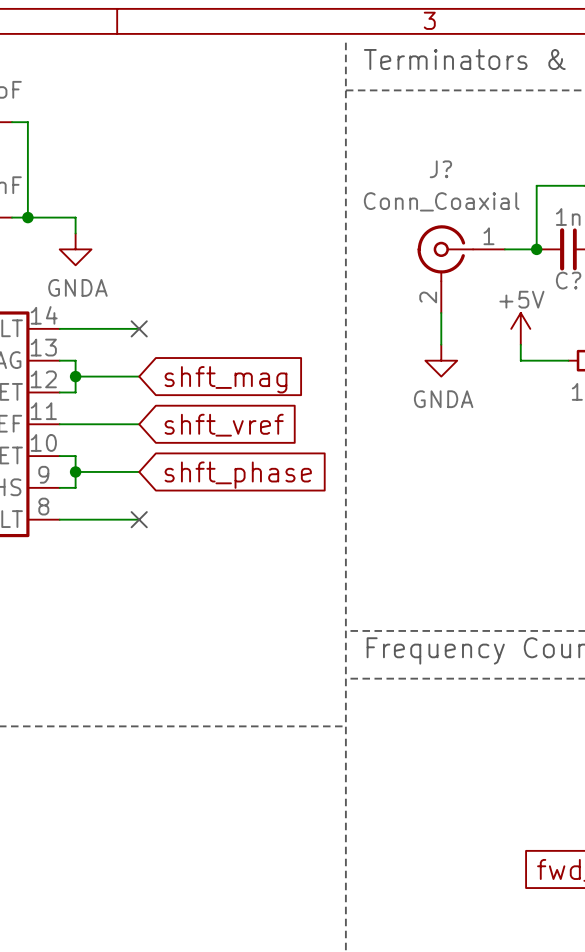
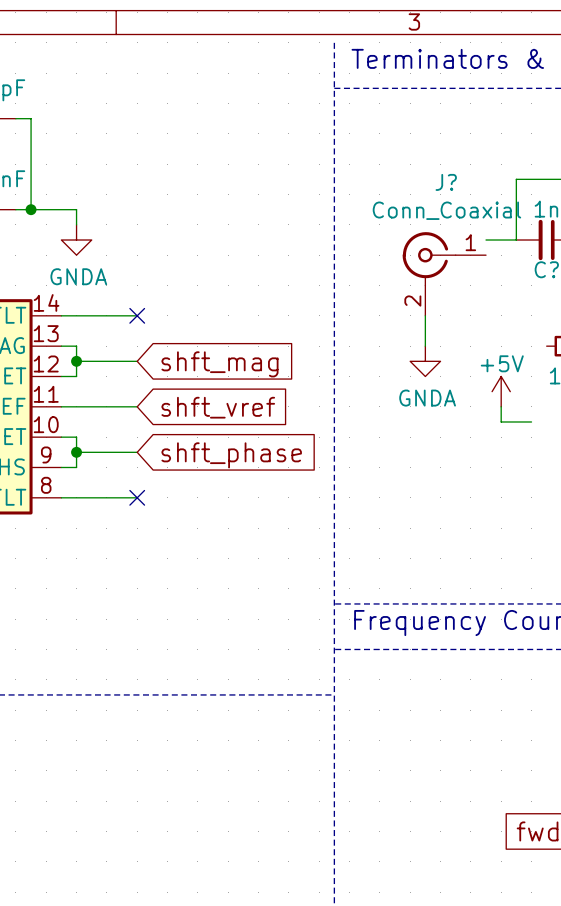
J? name position: J? (440, 169) -> J? (446, 182)
J? value position: Conn_Coaxial (441, 201) -> Conn_Coaxial (446, 210)
junction: (536, 249) -> none
J? position: (461, 269) -> (444, 273)
power symbol position: +5V (520, 328) -> +5V (501, 391)
wire: (520, 344) (520, 360) (568, 360) -> none
power symbol position: GNDA (441, 360) -> GNDA (425, 361)
wire: none -> (501, 406) (501, 421) (531, 421)

